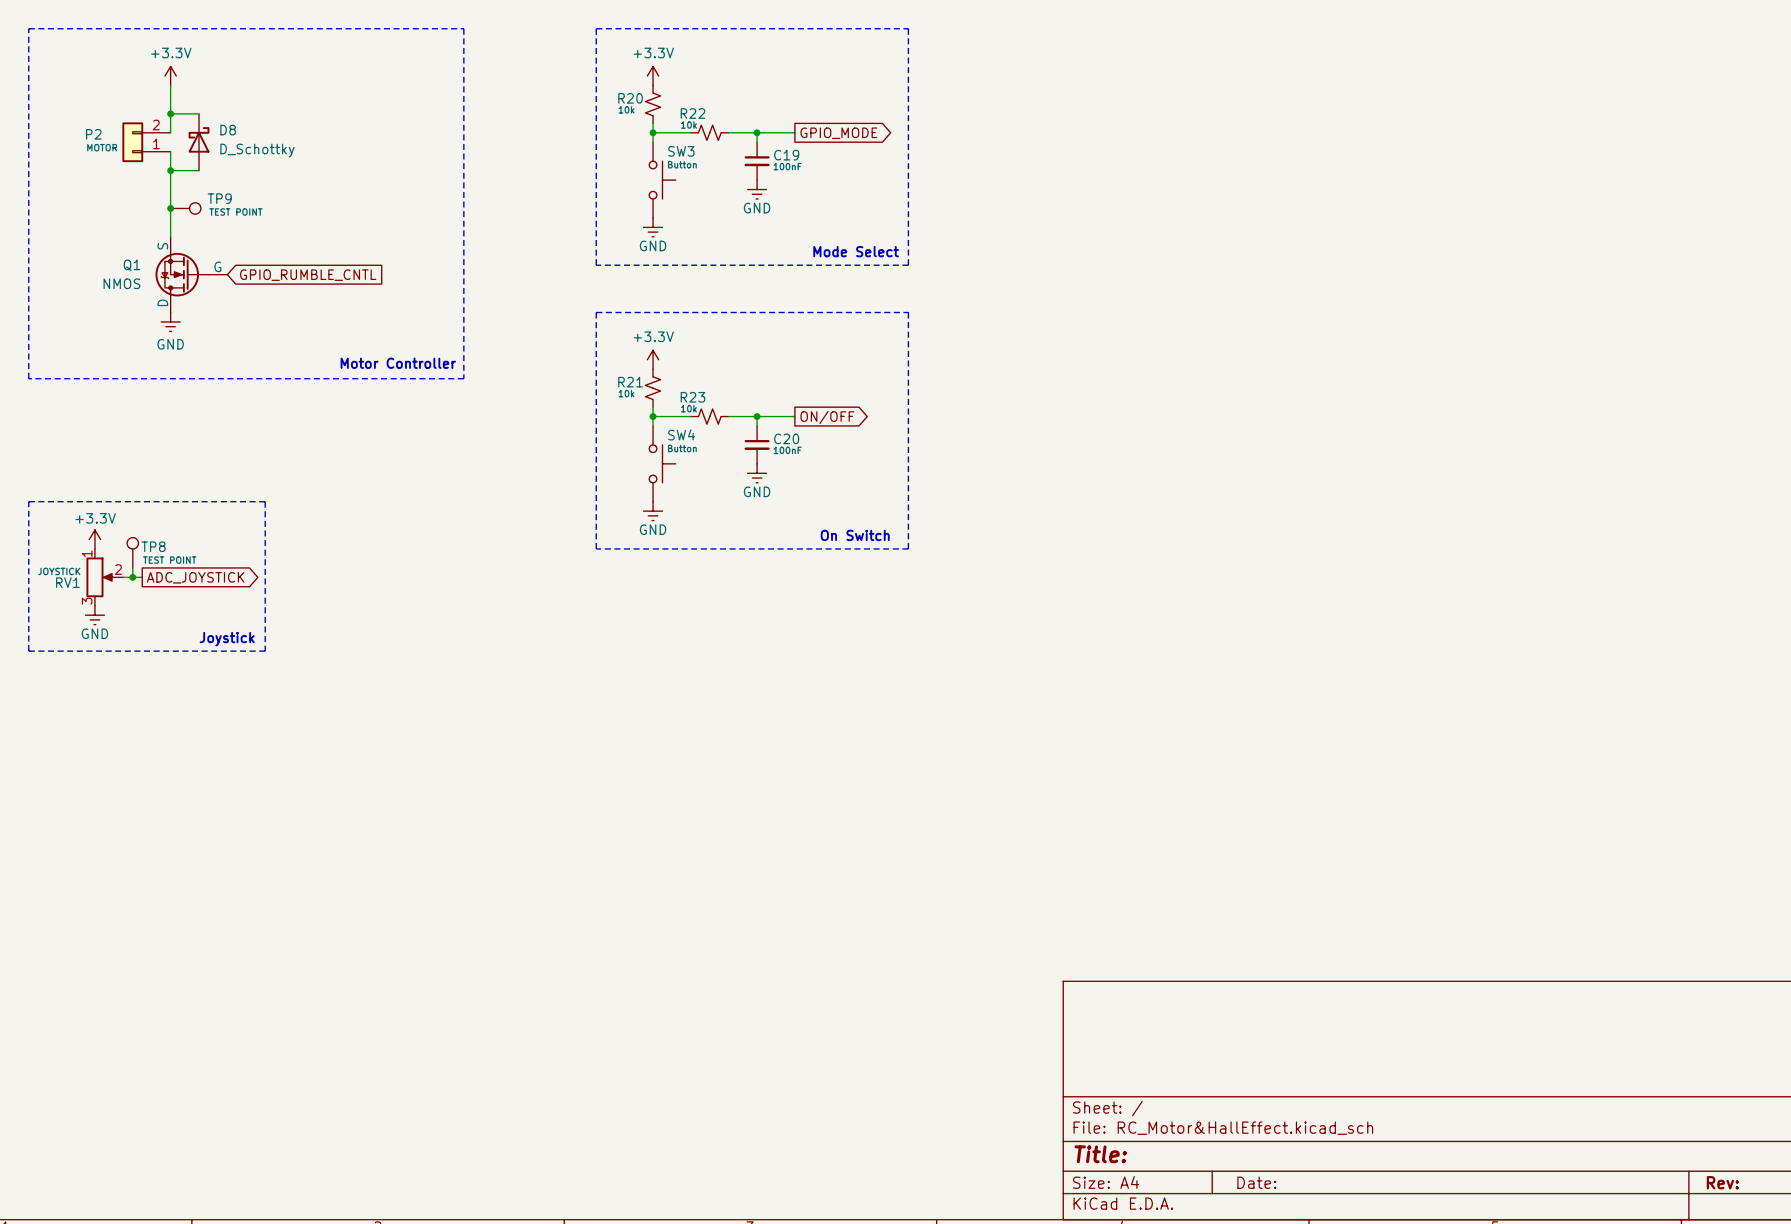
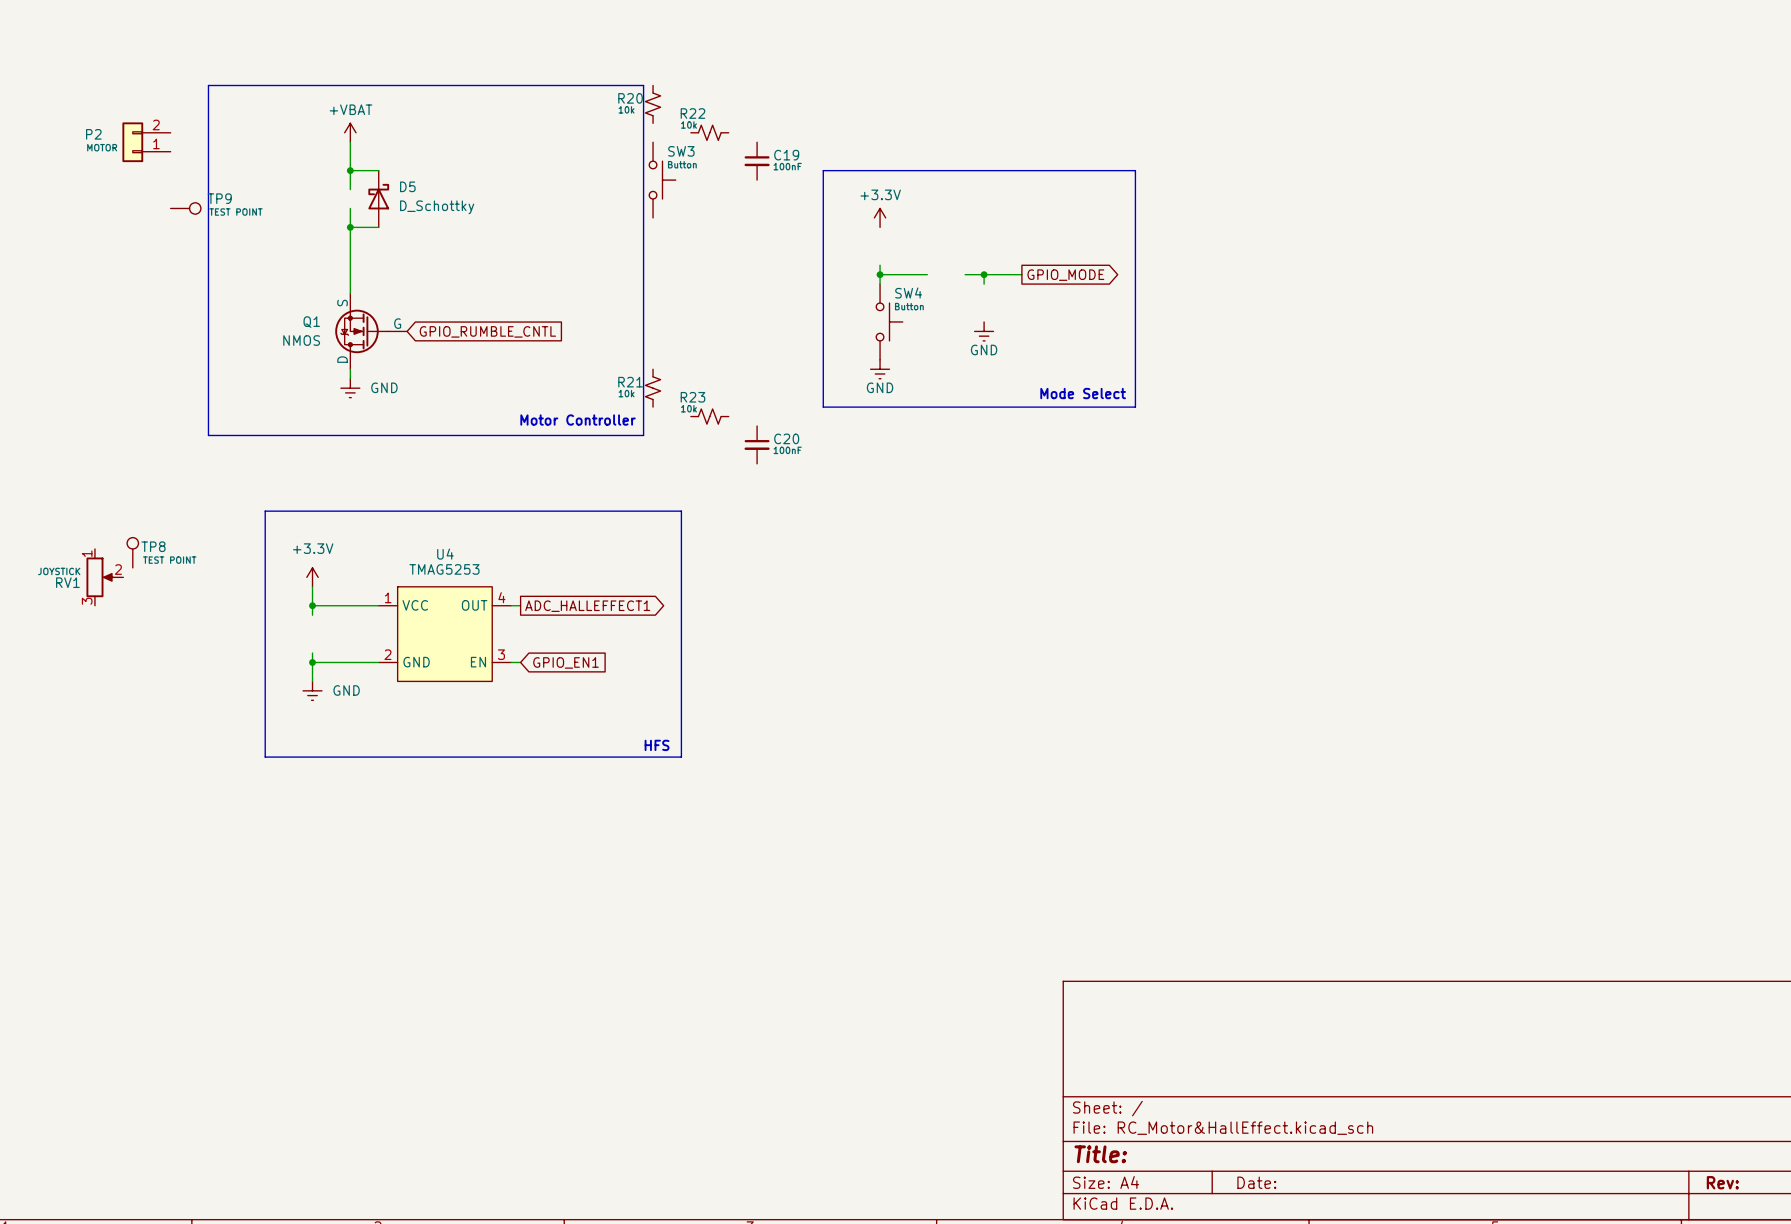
line: (28, 28) (28, 378) (463, 378) (463, 28) (28, 28) -> none
line: (596, 28) (596, 265) (908, 265) (908, 28) (596, 28) -> none
power symbol: +3.3V (170, 76) -> none
power symbol: +3.3V (653, 76) -> none
wire: (170, 85) (170, 132) -> none
line: none -> (208, 85) (643, 85) (643, 435) (208, 435) (208, 85)
wire: (170, 113) (199, 113) -> none
junction: (170, 113) -> none
wire: (653, 123) (653, 142) -> none
power symbol: none -> +VBAT (350, 132)
wire: (653, 132) (690, 132) -> none
junction: (653, 132) -> none
wire: (728, 132) (794, 132) -> none
wire: (757, 132) (757, 142) -> none
junction: (757, 132) -> none
global label: GPIO_MODE (838, 133) -> none
D8: D_Schottky (199, 142) -> none
wire: none -> (350, 142) (350, 189)
wire: (170, 151) (170, 236) -> none
wire: (170, 170) (199, 170) -> (350, 170) (378, 170)
junction: (170, 170) -> none
junction: none -> (350, 170)
line: none -> (823, 170) (1135, 170) (1135, 407) (823, 407) (823, 170)
power symbol: GND (757, 189) -> none
D5: none -> D_Schottky (378, 199)
junction: (170, 208) -> none
wire: none -> (350, 208) (350, 293)
power symbol: none -> +3.3V (880, 217)
wire: none -> (350, 227) (378, 227)
junction: none -> (350, 227)
power symbol: GND (653, 227) -> none
text: Mode Select (856, 251) -> none
wire: none -> (880, 265) (880, 284)
Q1 position: (191, 274) -> (371, 331)
wire: none -> (880, 274) (927, 274)
junction: none -> (880, 274)
wire: none -> (965, 274) (1021, 274)
wire: none -> (984, 274) (984, 284)
junction: none -> (984, 274)
global label: GPIO_RUMBLE_CNTL (308, 275) -> none
global label: none -> GPIO_MODE (1065, 275)
line: (596, 312) (908, 312) (908, 548) (596, 548) (596, 312) -> none
power symbol: GND (170, 321) -> none
global label: none -> GPIO_RUMBLE_CNTL (487, 331)
power symbol: none -> GND (984, 331)
power symbol: +3.3V (653, 359) -> none
text: Motor Controller (398, 363) -> none
wire: none -> (350, 369) (350, 378)
power symbol: none -> GND (880, 369)
power symbol: none -> GND (350, 388)
text: none -> Mode Select (1083, 393)
wire: (653, 407) (653, 426) -> none
wire: (653, 416) (690, 416) -> none
junction: (653, 416) -> none
wire: (728, 416) (794, 416) -> none
wire: (757, 416) (757, 426) -> none
junction: (757, 416) -> none
global label: ON/OFF (827, 417) -> none
text: none -> Motor Controller (578, 420)
SW4 position: (662, 463) -> (889, 321)
power symbol: GND (757, 473) -> none
line: (28, 501) (265, 501) (265, 651) (28, 651) (28, 501) -> none
line: none -> (265, 511) (681, 511) (681, 757) (265, 757) (265, 511)
power symbol: GND (653, 511) -> none
text: On Switch (855, 535) -> none
power symbol: +3.3V (94, 539) -> none
wire: (132, 567) (132, 577) -> none
wire: (123, 577) (142, 577) -> none
junction: (132, 577) -> none
global label: ADC_JOYSTICK (195, 577) -> none
power symbol: none -> +3.3V (312, 577)
wire: none -> (312, 586) (312, 615)
wire: none -> (312, 605) (378, 605)
junction: none -> (312, 605)
wire: none -> (511, 605) (520, 605)
global label: none -> ADC_HALLEFFECT1 (587, 606)
power symbol: GND (94, 615) -> none
U4: none -> TMAG5253 (444, 634)
text: Joystick (227, 639) -> none
wire: none -> (312, 653) (312, 681)
wire: none -> (312, 662) (378, 662)
junction: none -> (312, 662)
wire: none -> (511, 662) (520, 662)
global label: none -> GPIO_EN1 (566, 662)
power symbol: none -> GND (312, 690)
text: none -> HFS (657, 745)

